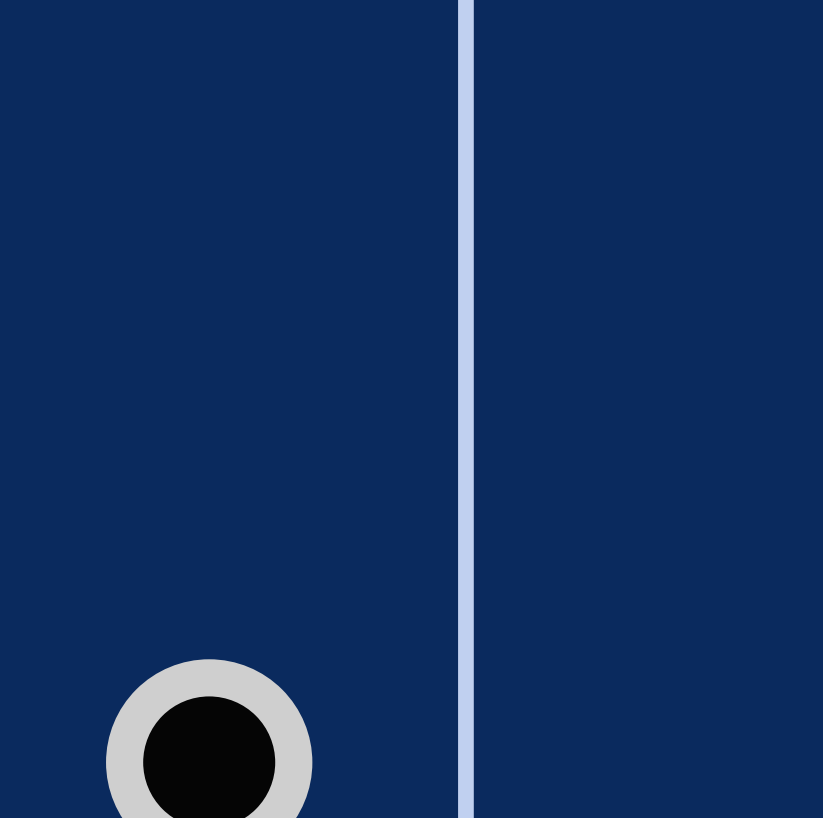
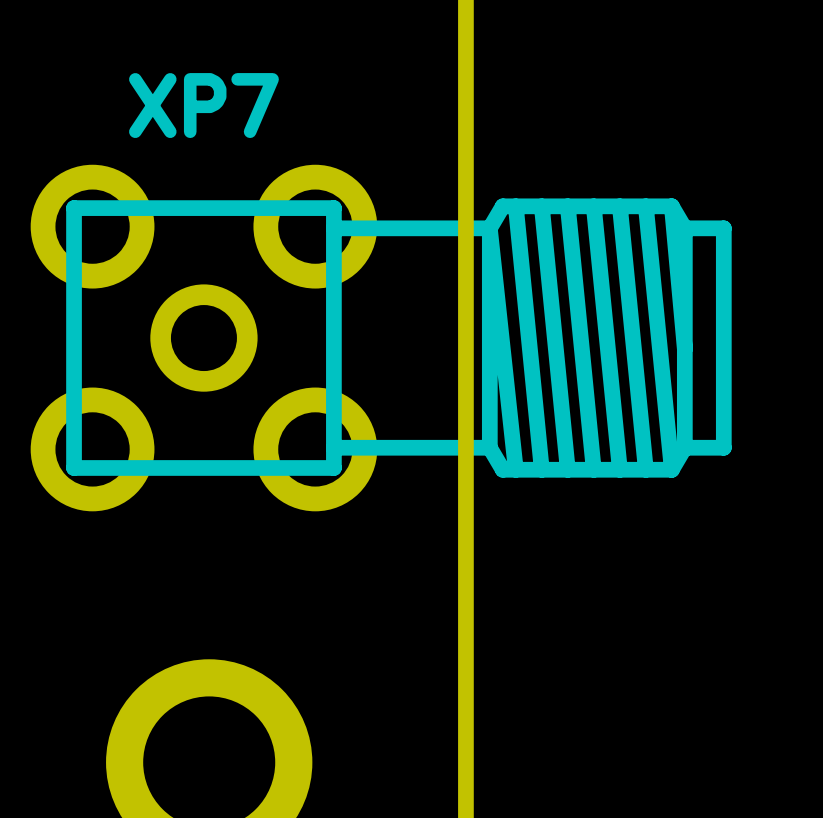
XP7: none -> (381, 338)

